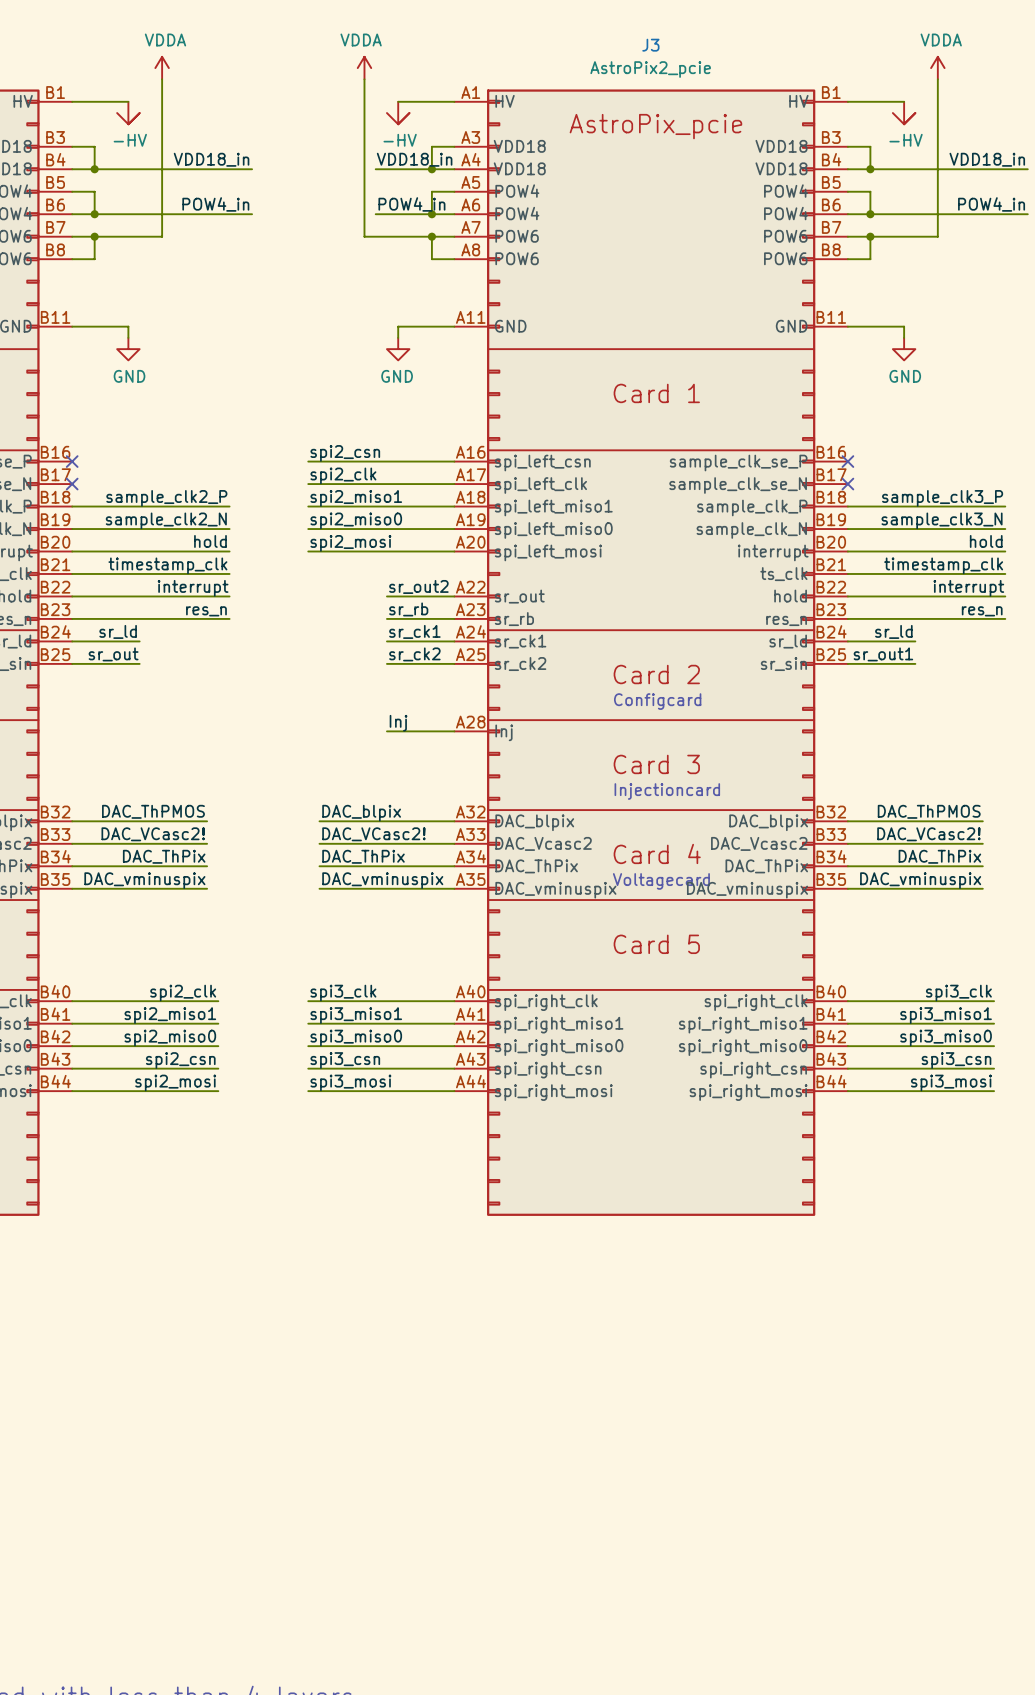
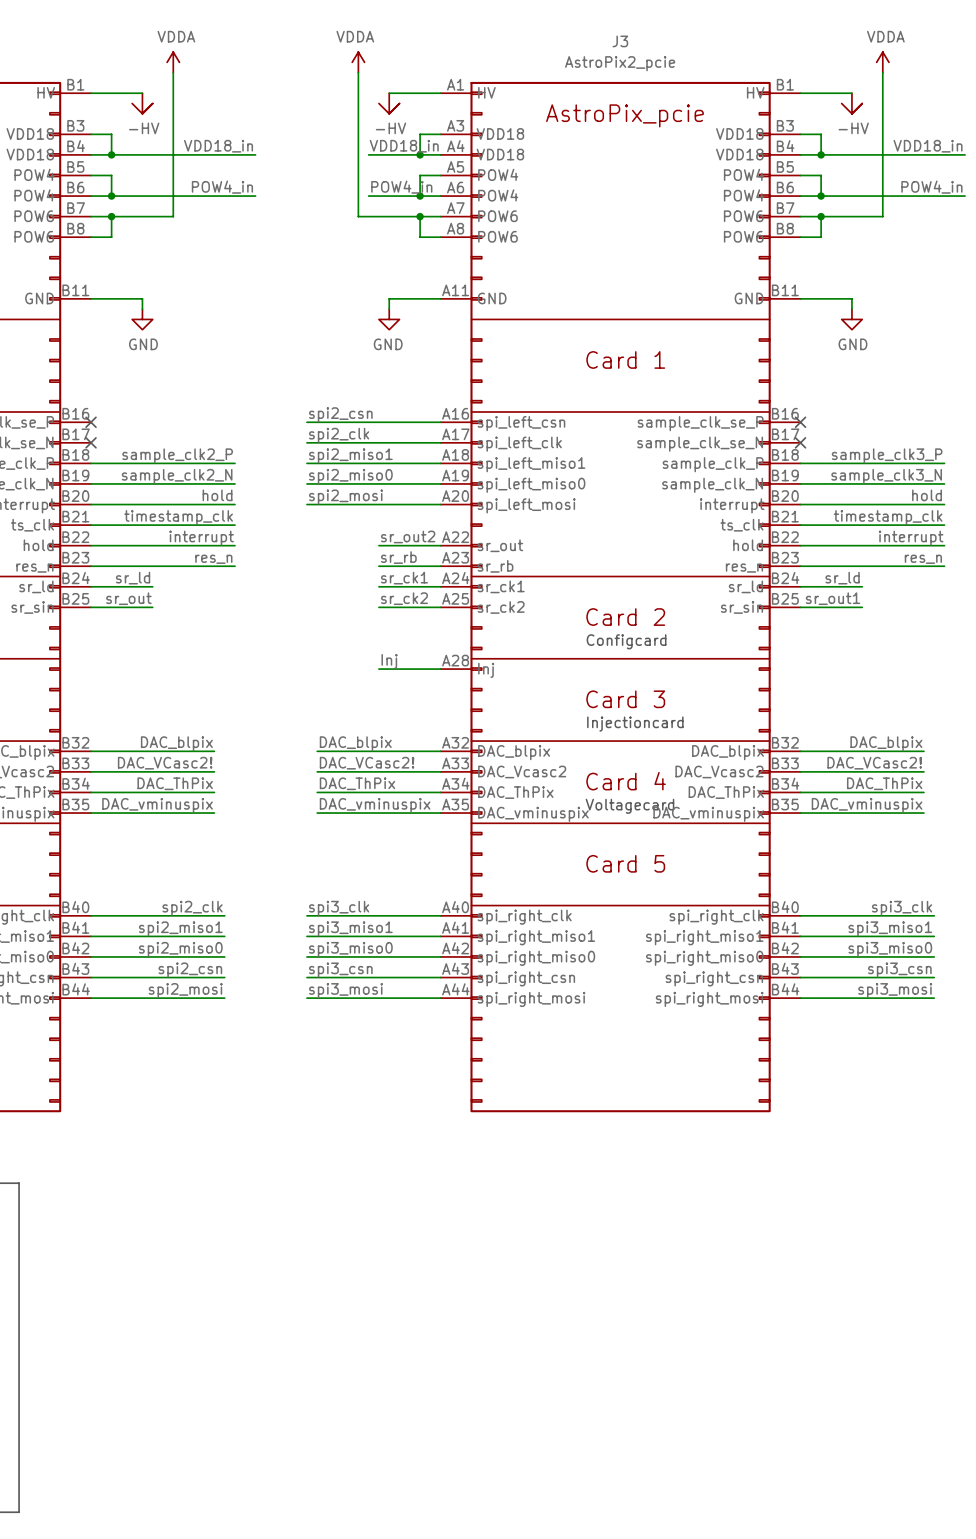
label: DAC_ThPMOS (153, 811) -> DAC_blpix (176, 743)
label: DAC_ThPMOS (929, 811) -> DAC_blpix (886, 743)

